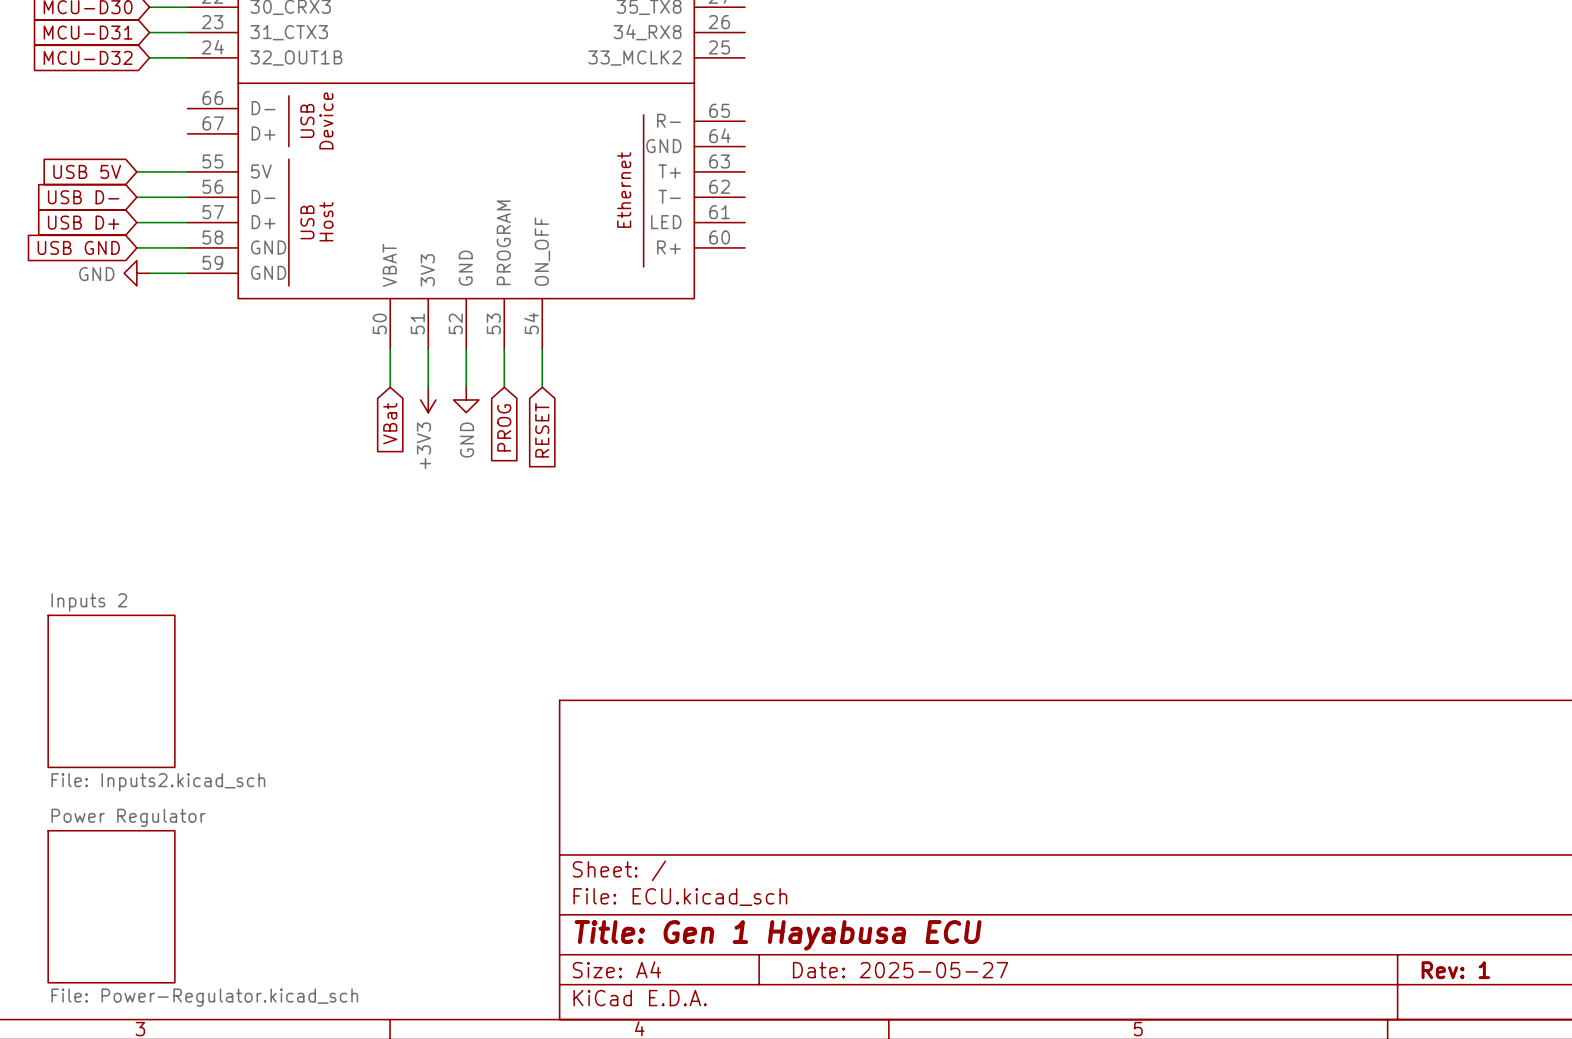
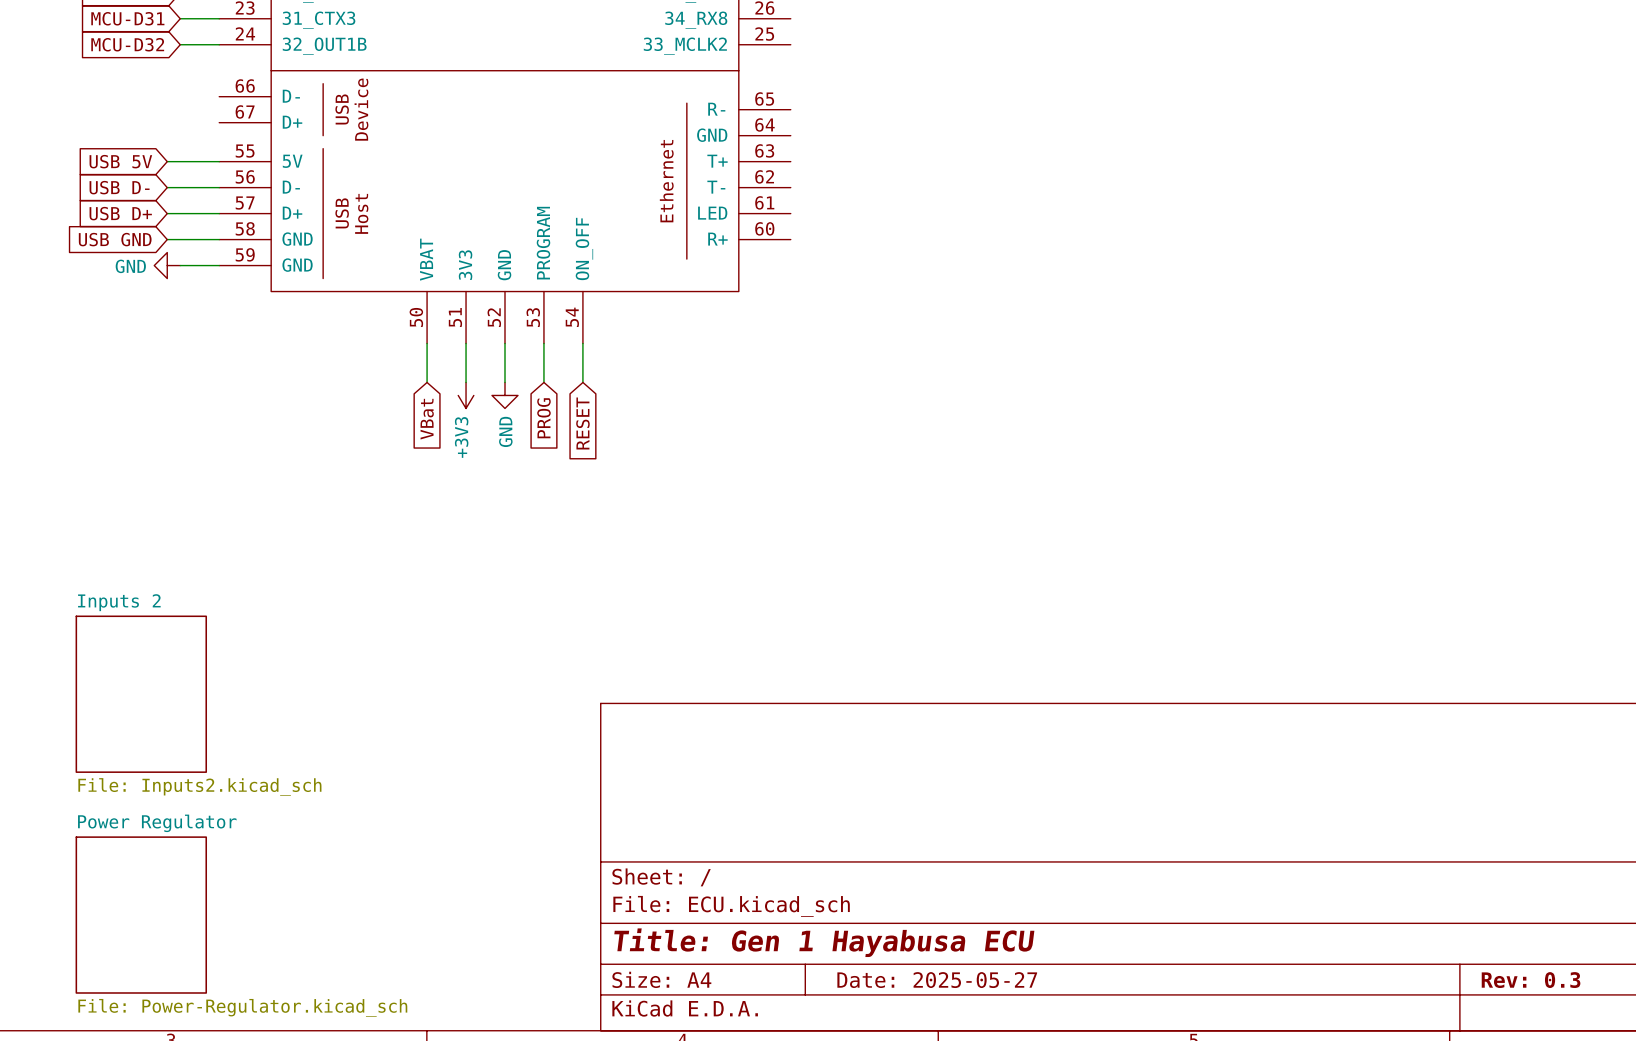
title block: Rev: 1 (1455, 970) -> Rev: 0.3 (1531, 980)

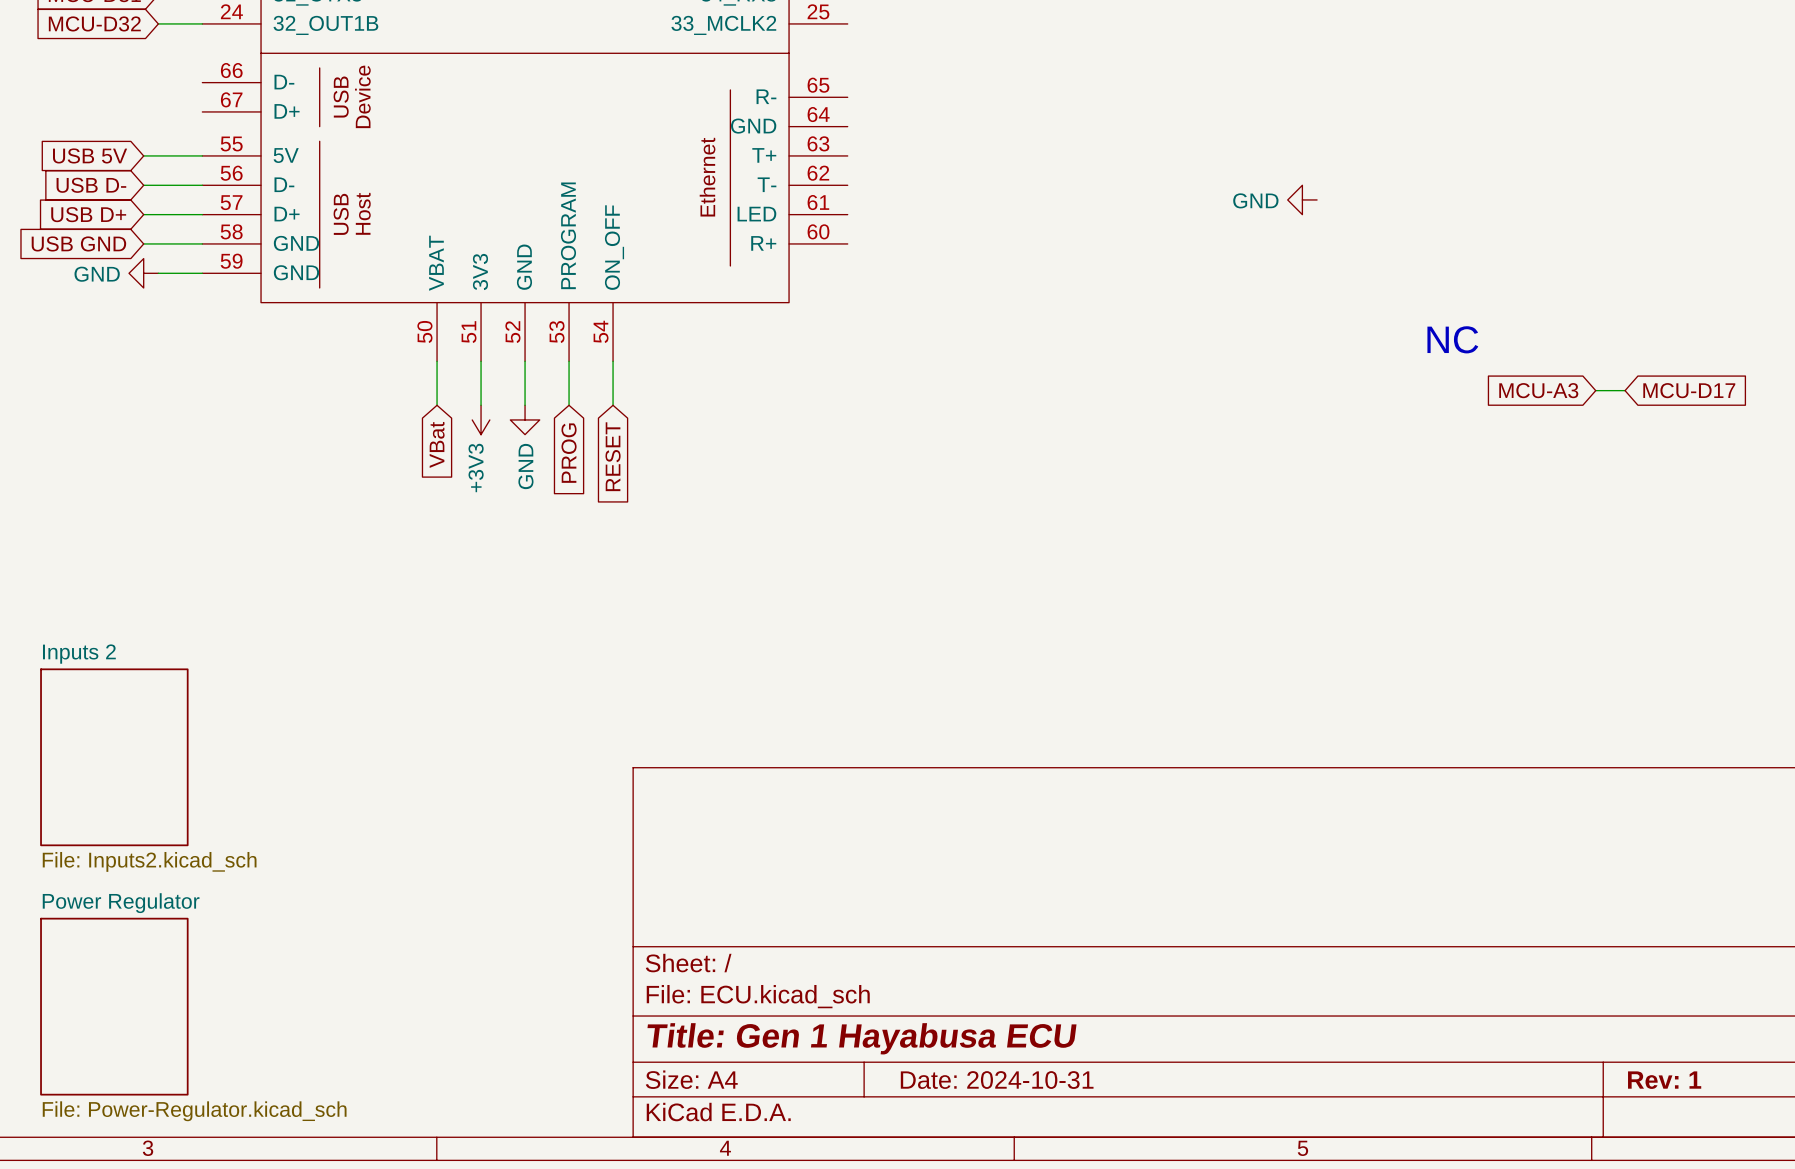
power symbol: none -> GND (1302, 199)
text: none -> NC (1452, 339)
global label: none -> MCU-A3 (1538, 390)
wire: none -> (1595, 390) (1625, 390)
global label: none -> MCU-D17 (1689, 390)
title block: Date: 2025-05-27 (937, 980) -> Date: 2024-10-31 (997, 1080)
title block: Rev: 0.3 (1531, 980) -> Rev: 1 (1664, 1080)

